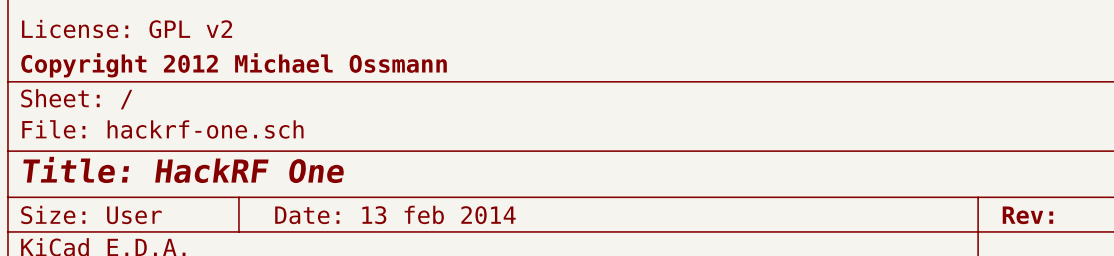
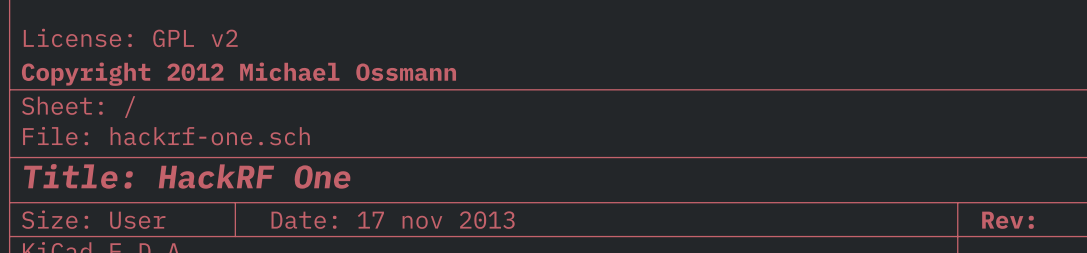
title block: Date: 13 feb 2014 (395, 214) -> Date: 17 nov 2013 (393, 220)

